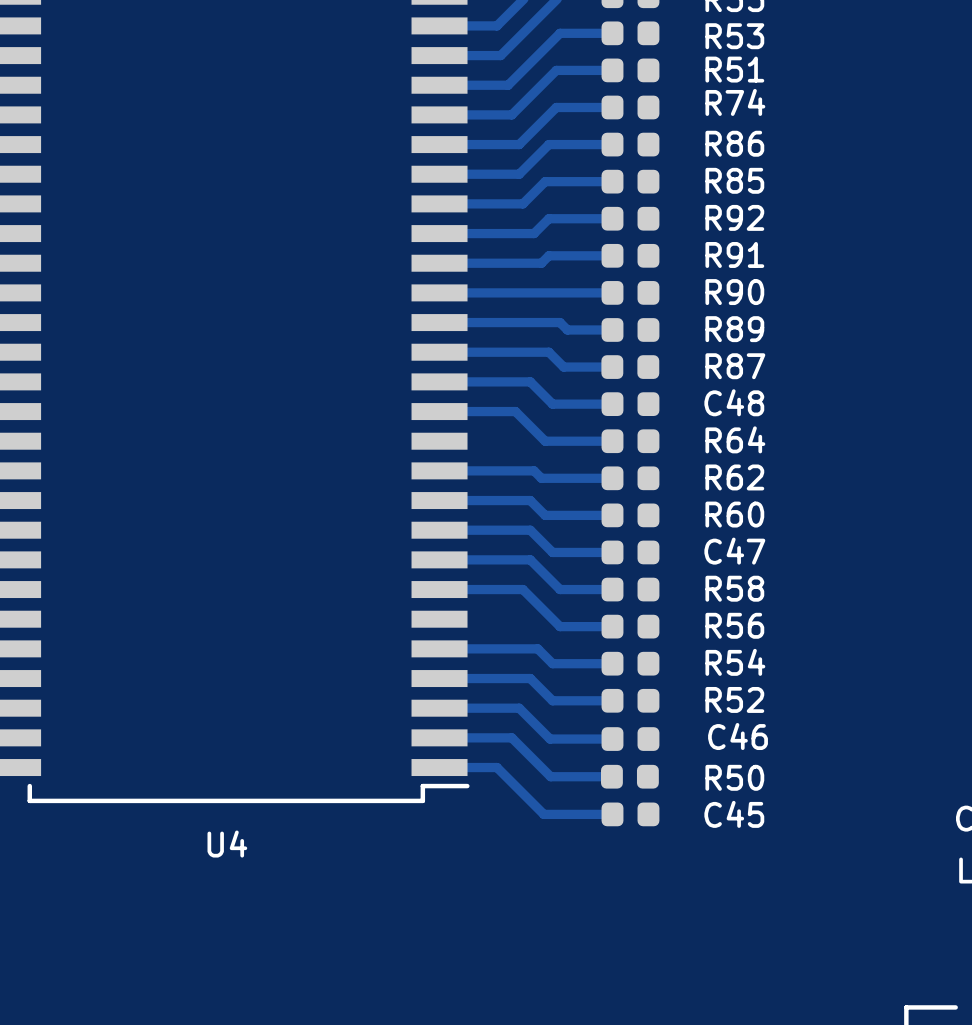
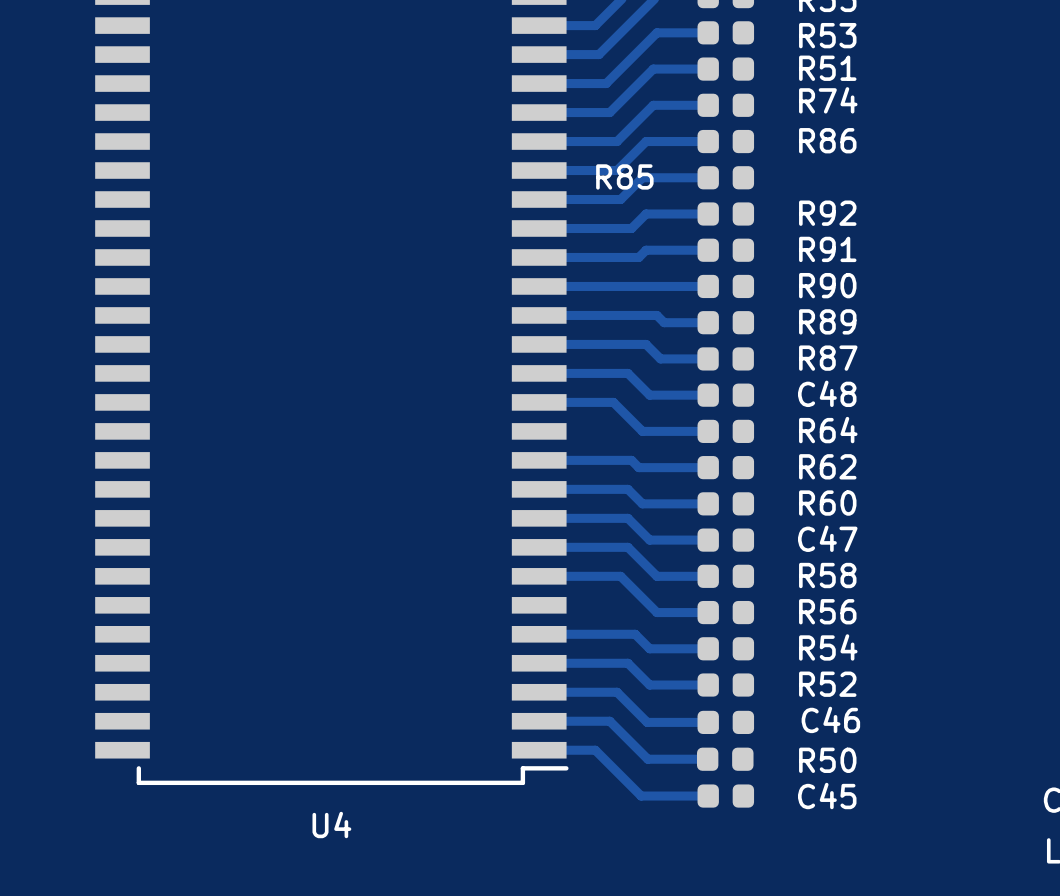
R85 name position: R85 (734, 180) -> R85 (624, 176)

